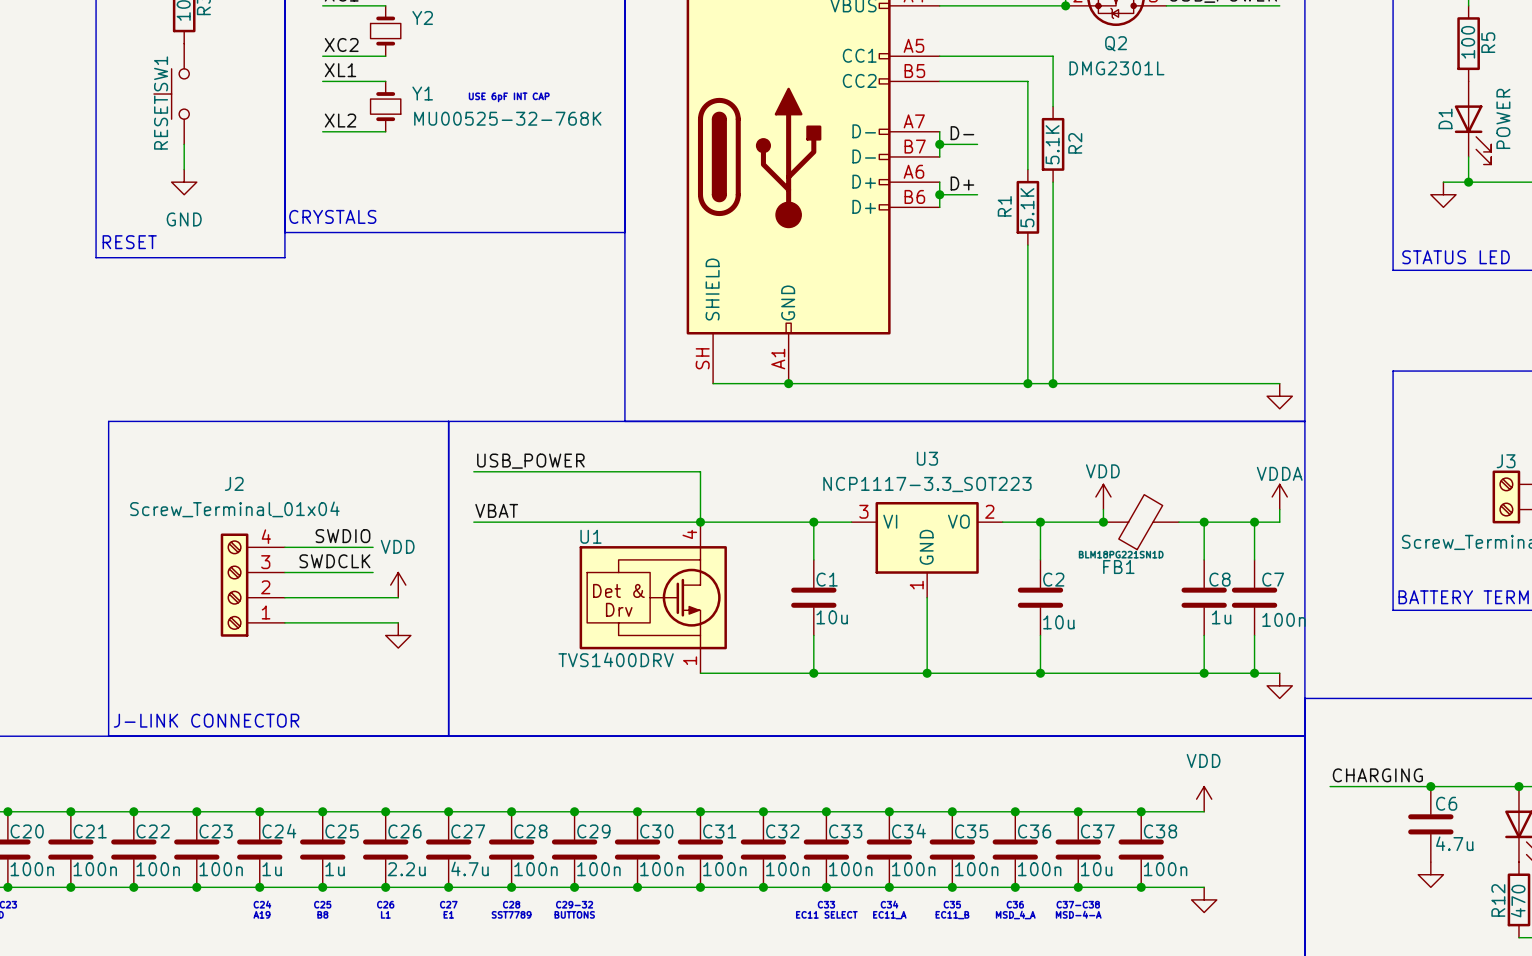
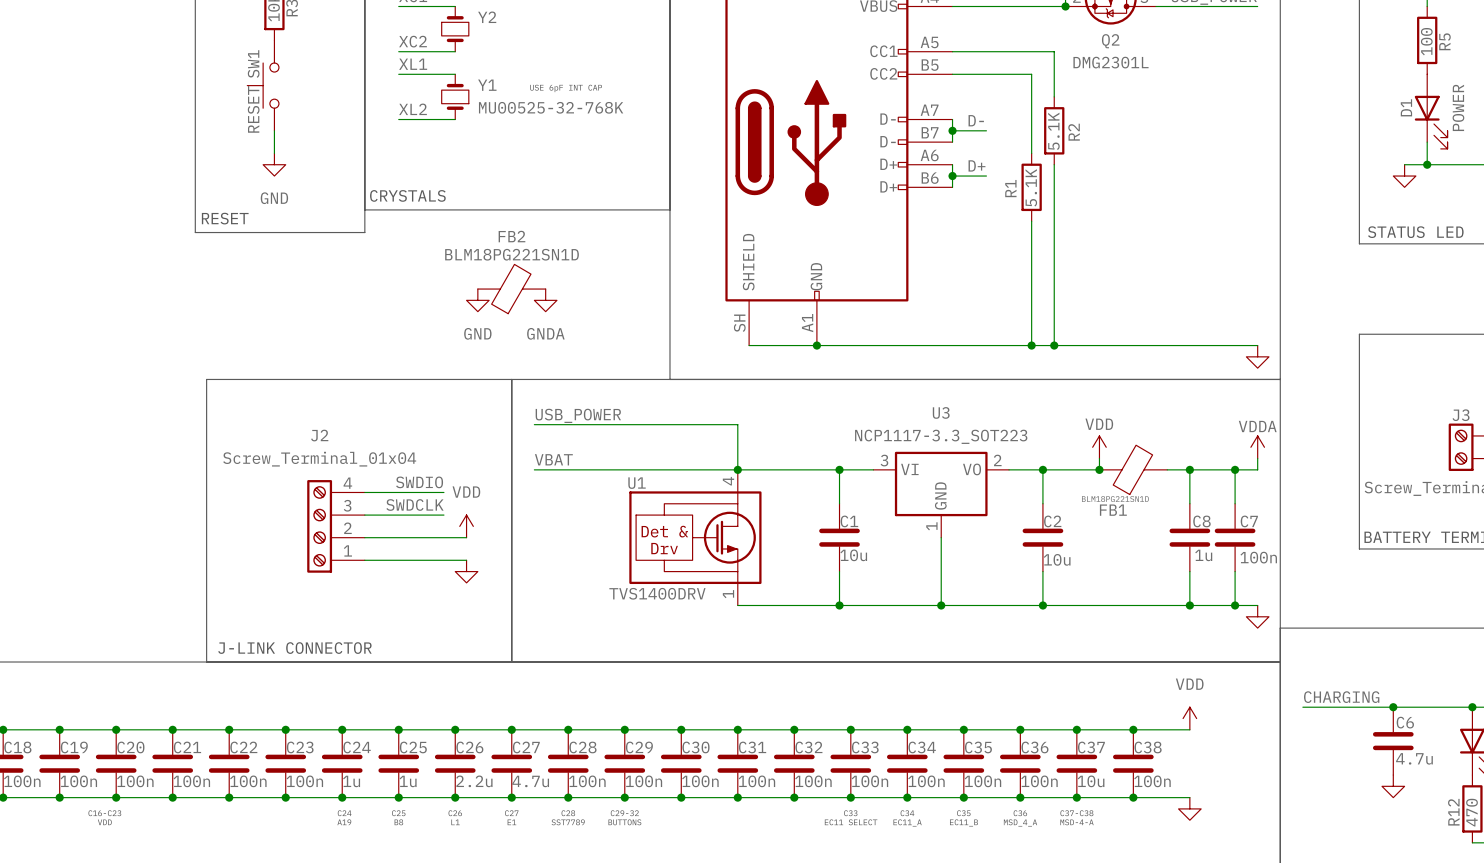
FB2: none -> BLM18PG221SN1D (511, 289)
power symbol: none -> GND (477, 300)
power symbol: none -> GNDA (545, 300)

